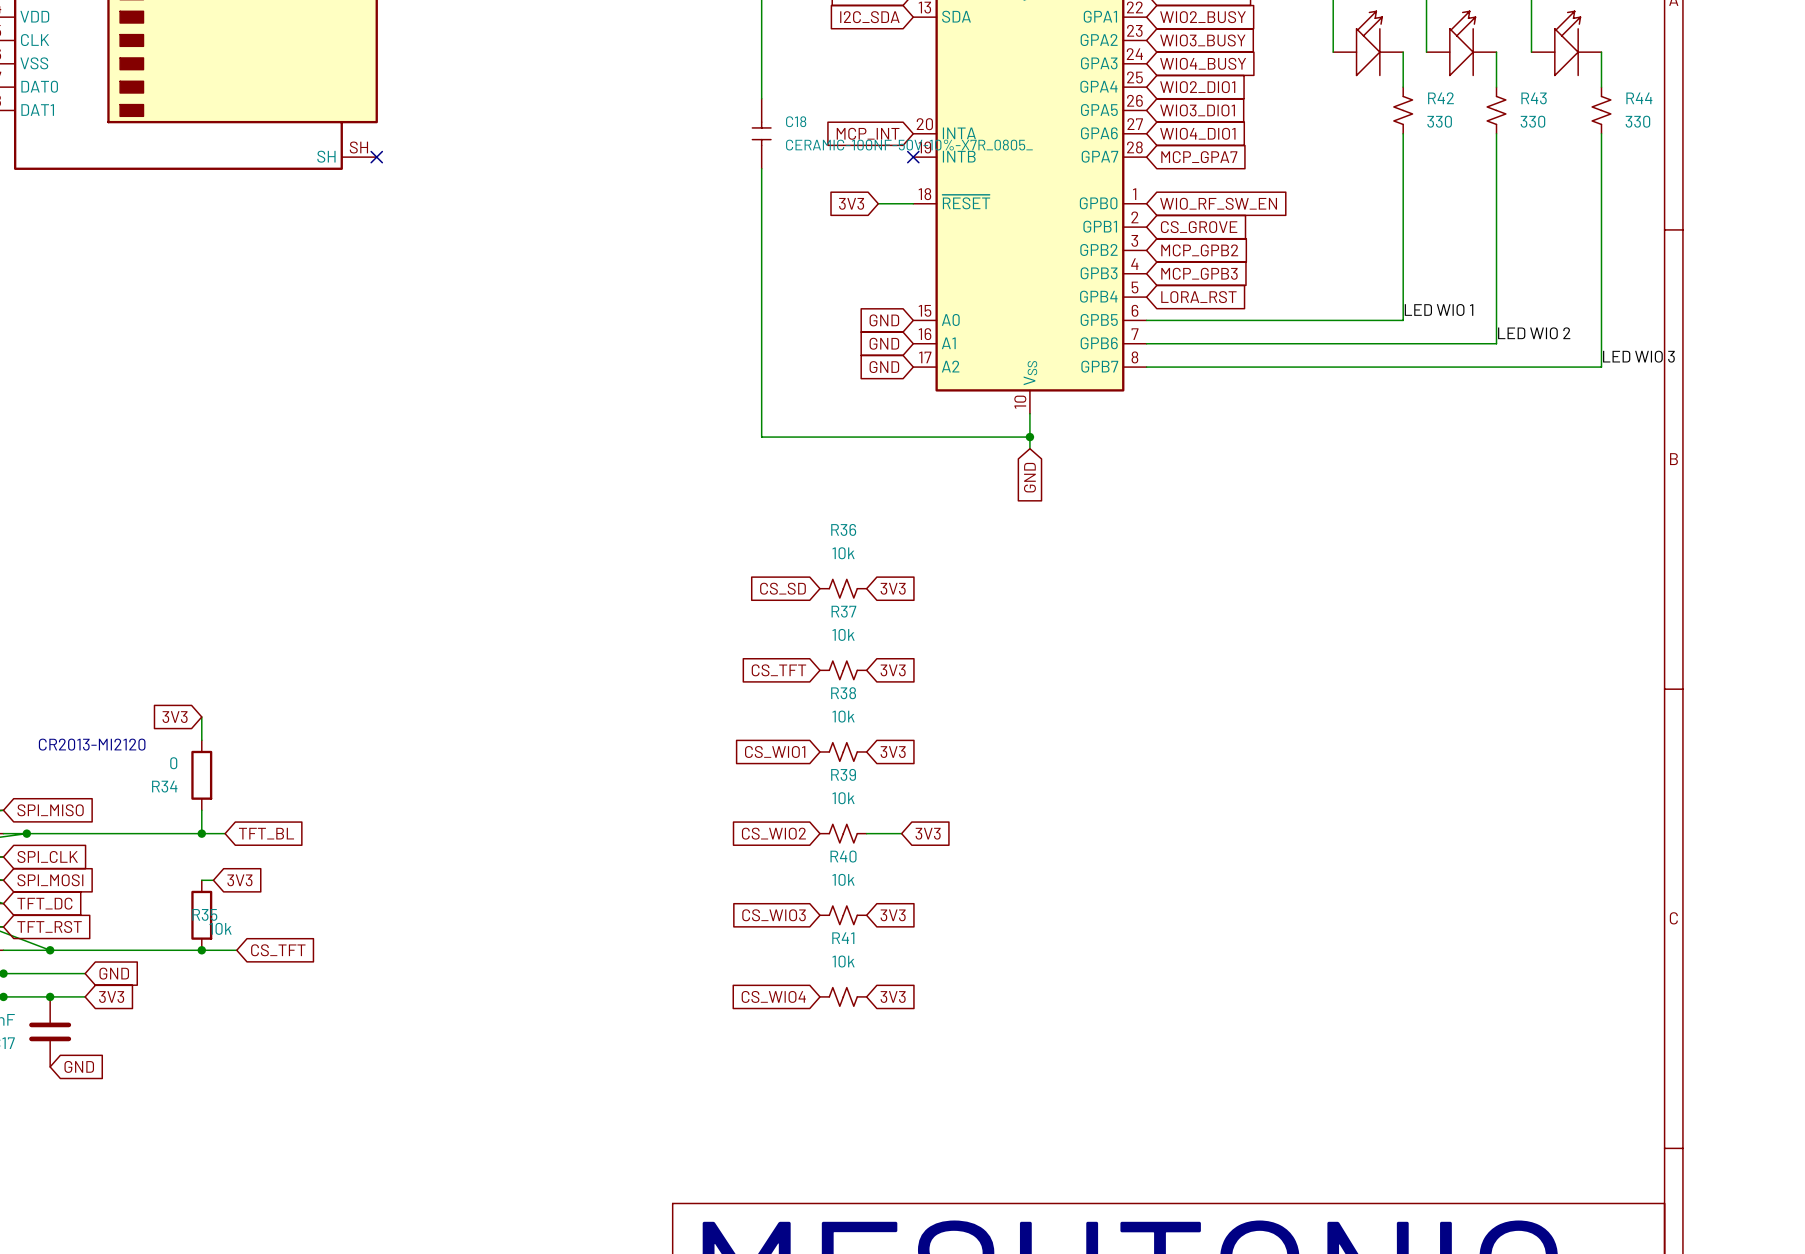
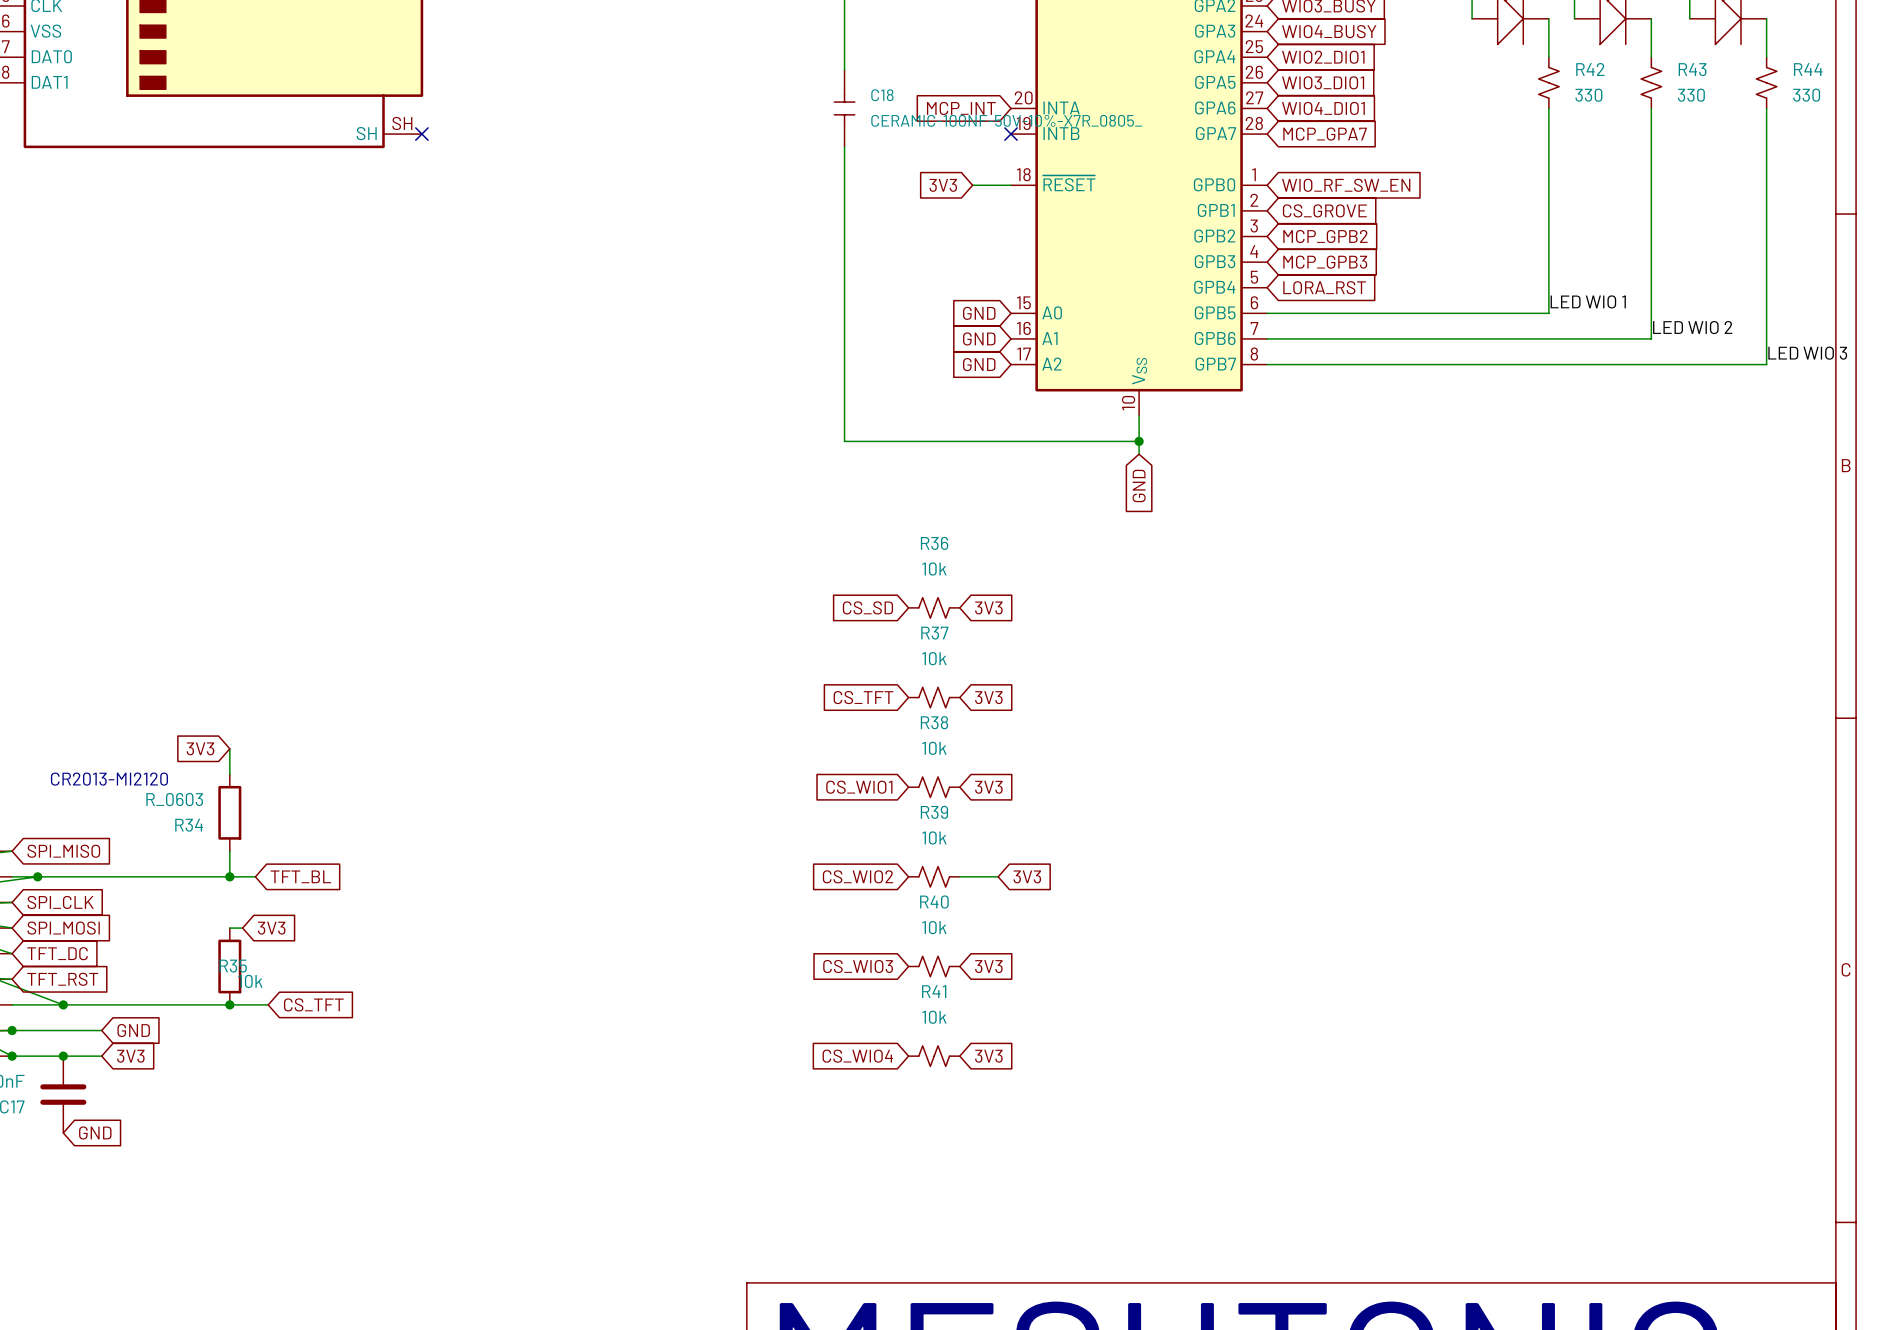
R34 value: 0 (173, 763) -> R_0603 (174, 799)

